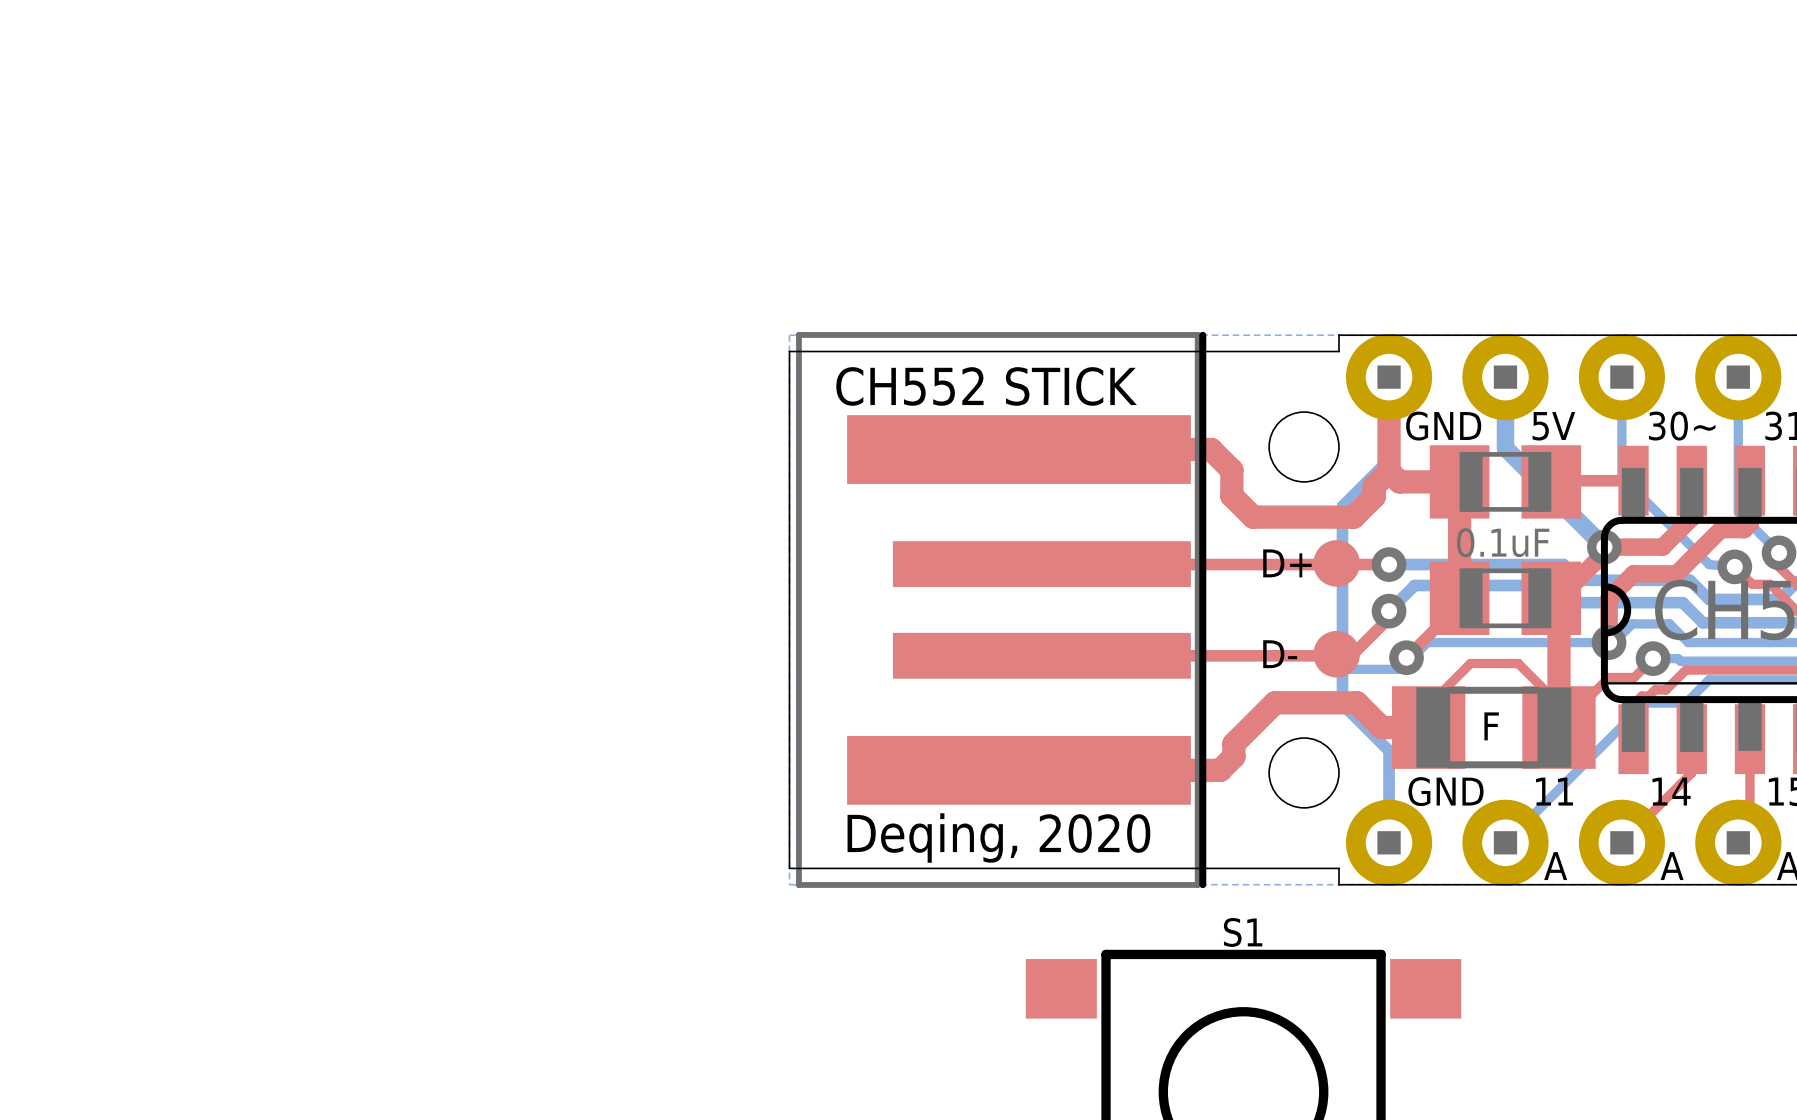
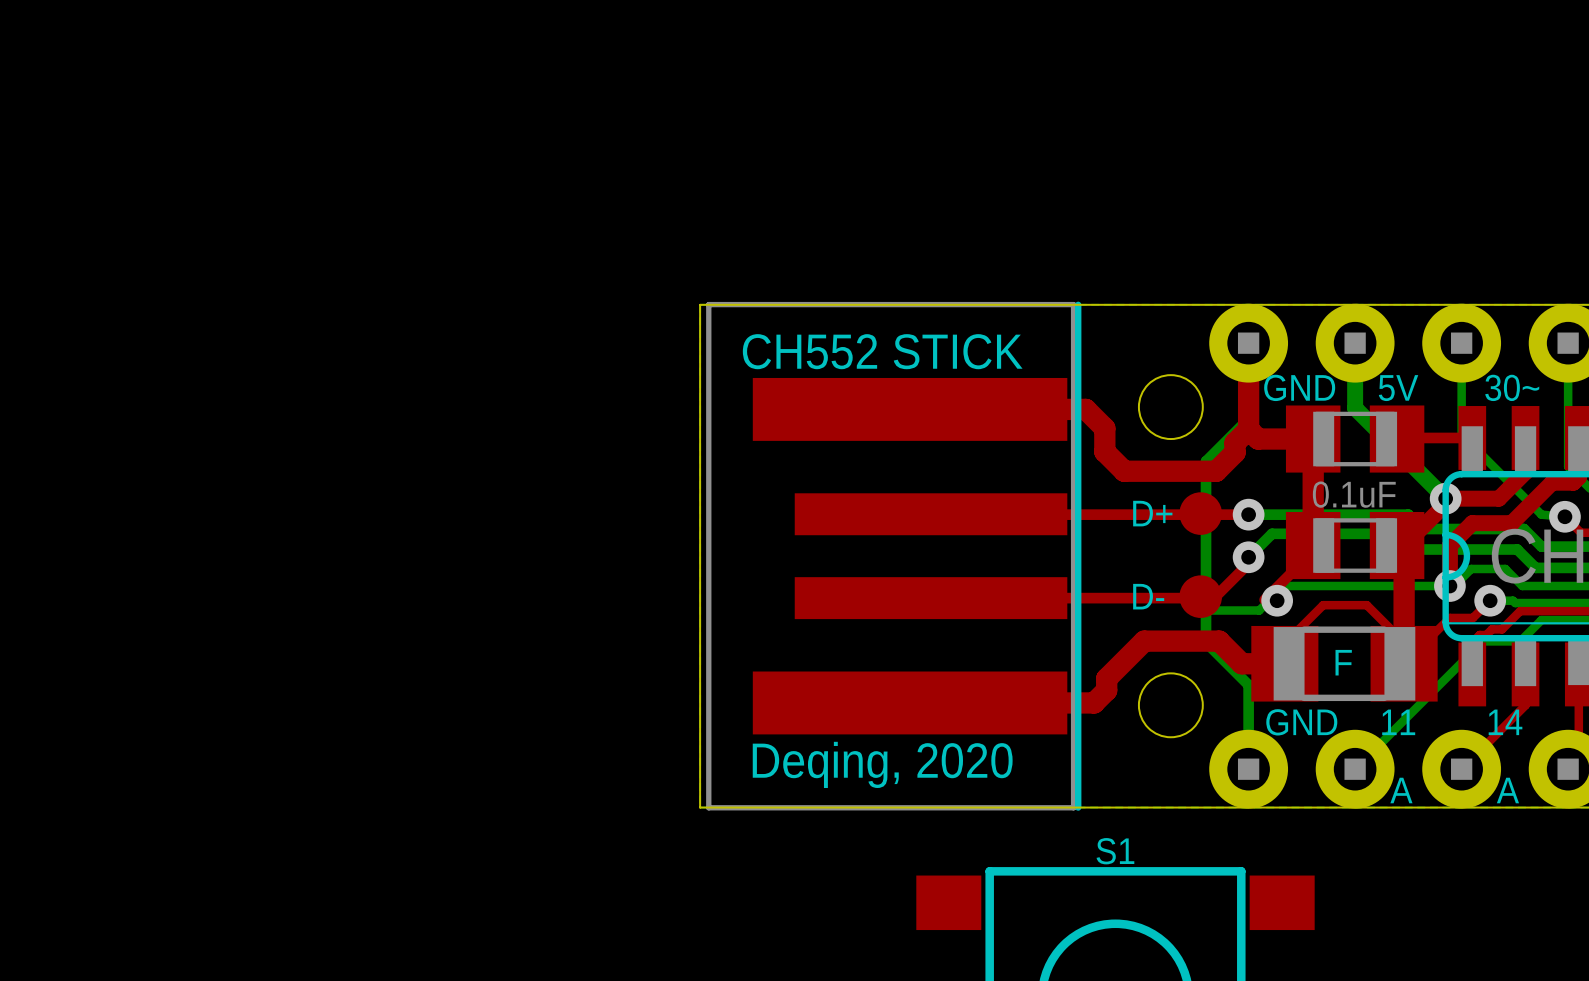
board edge: (1338, 335) (1338, 351) (789, 351) -> (1202, 304) (700, 304) (700, 319)
via position: (1406, 657) -> (1277, 600)
board edge: (789, 868) (1338, 868) (1338, 884) -> (700, 792) (700, 807) (1202, 807)

